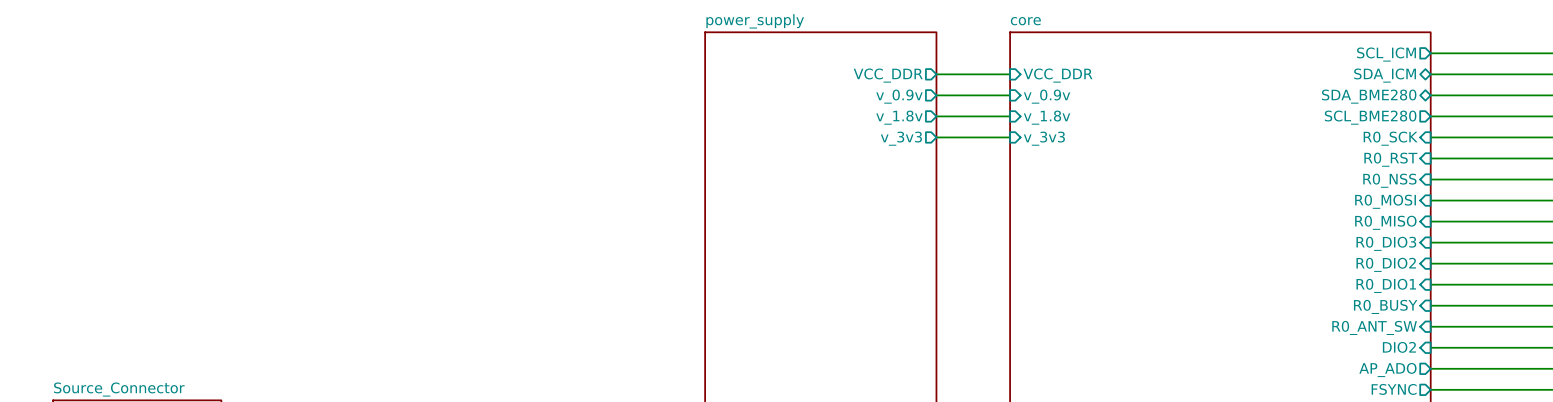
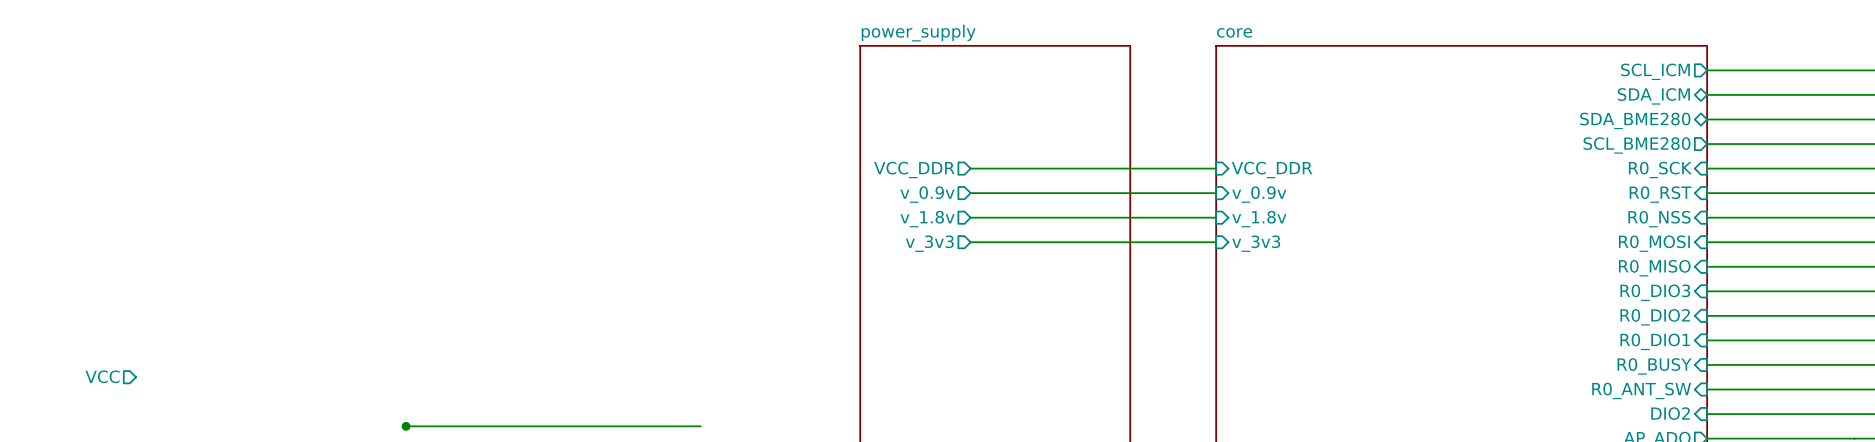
wire: (936, 74) (1010, 74) -> none
sheet pin: VCC_DDR (888, 75) -> none
sheet pin: VCC_DDR (1058, 75) -> none
wire: (936, 95) (1010, 95) -> none
sheet pin: v_0.9v (899, 96) -> none
sheet pin: v_0.9v (1047, 96) -> none
wire: (936, 116) (1010, 116) -> none
sheet pin: v_1.8v (899, 117) -> none
sheet pin: v_1.8v (1047, 117) -> none
wire: none -> (970, 168) (1130, 168)
sheet pin: none -> VCC_DDR (914, 170)
sheet pin: v_3v3 (901, 138) -> none
sheet pin: v_3v3 (1044, 138) -> VCC_DDR (1272, 170)
wire: none -> (970, 193) (1216, 193)
sheet pin: none -> v_0.9v (927, 194)
sheet pin: none -> v_0.9v (1259, 194)
wire: none -> (970, 217) (1216, 217)
sheet pin: none -> v_1.8v (927, 219)
sheet pin: none -> v_1.8v (1259, 219)
wire: none -> (970, 242) (1216, 242)
sheet pin: none -> v_3v3 (929, 243)
sheet pin: none -> v_3v3 (1256, 243)
sheet pin: none -> VCC (102, 376)
wire: none -> (406, 426) (700, 426)
junction: none -> (406, 426)

